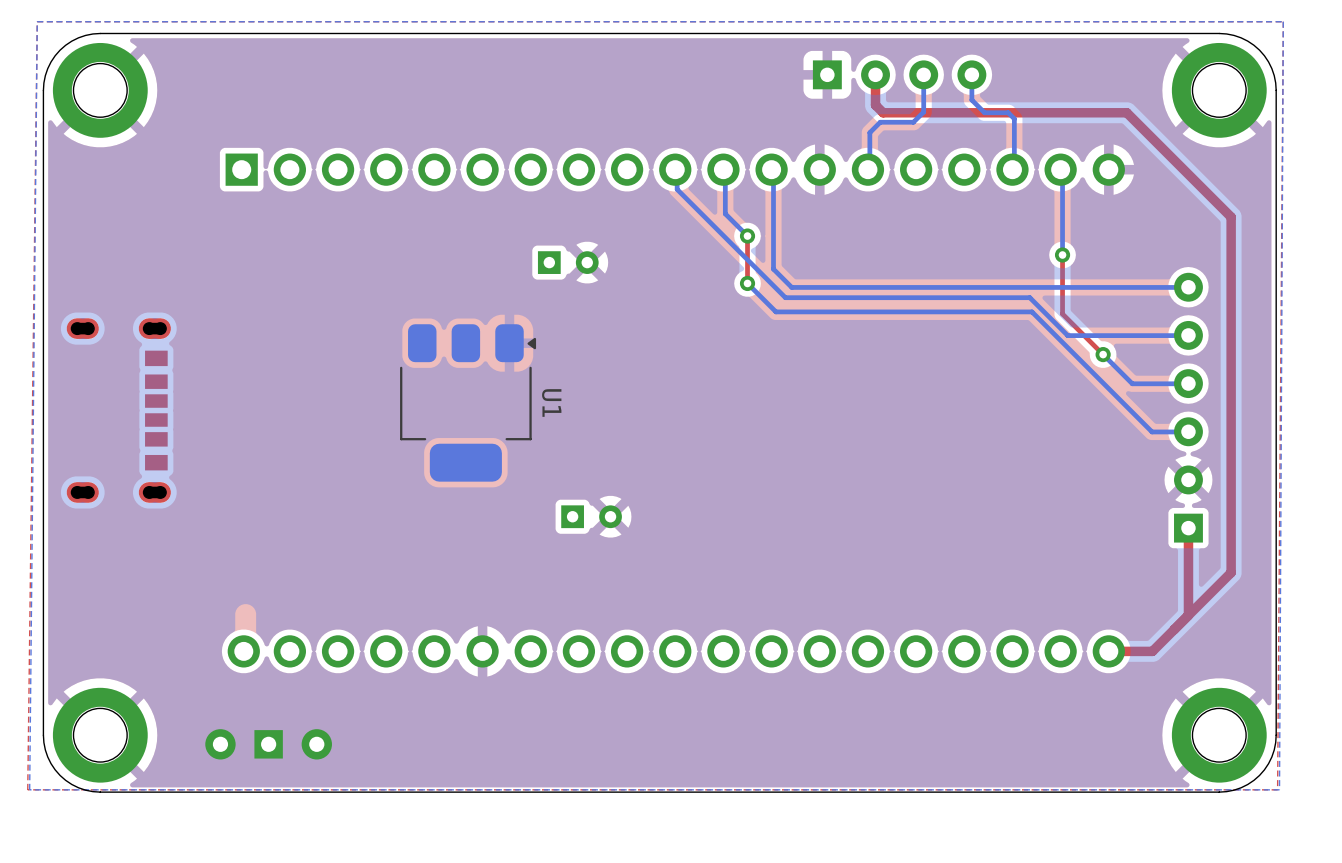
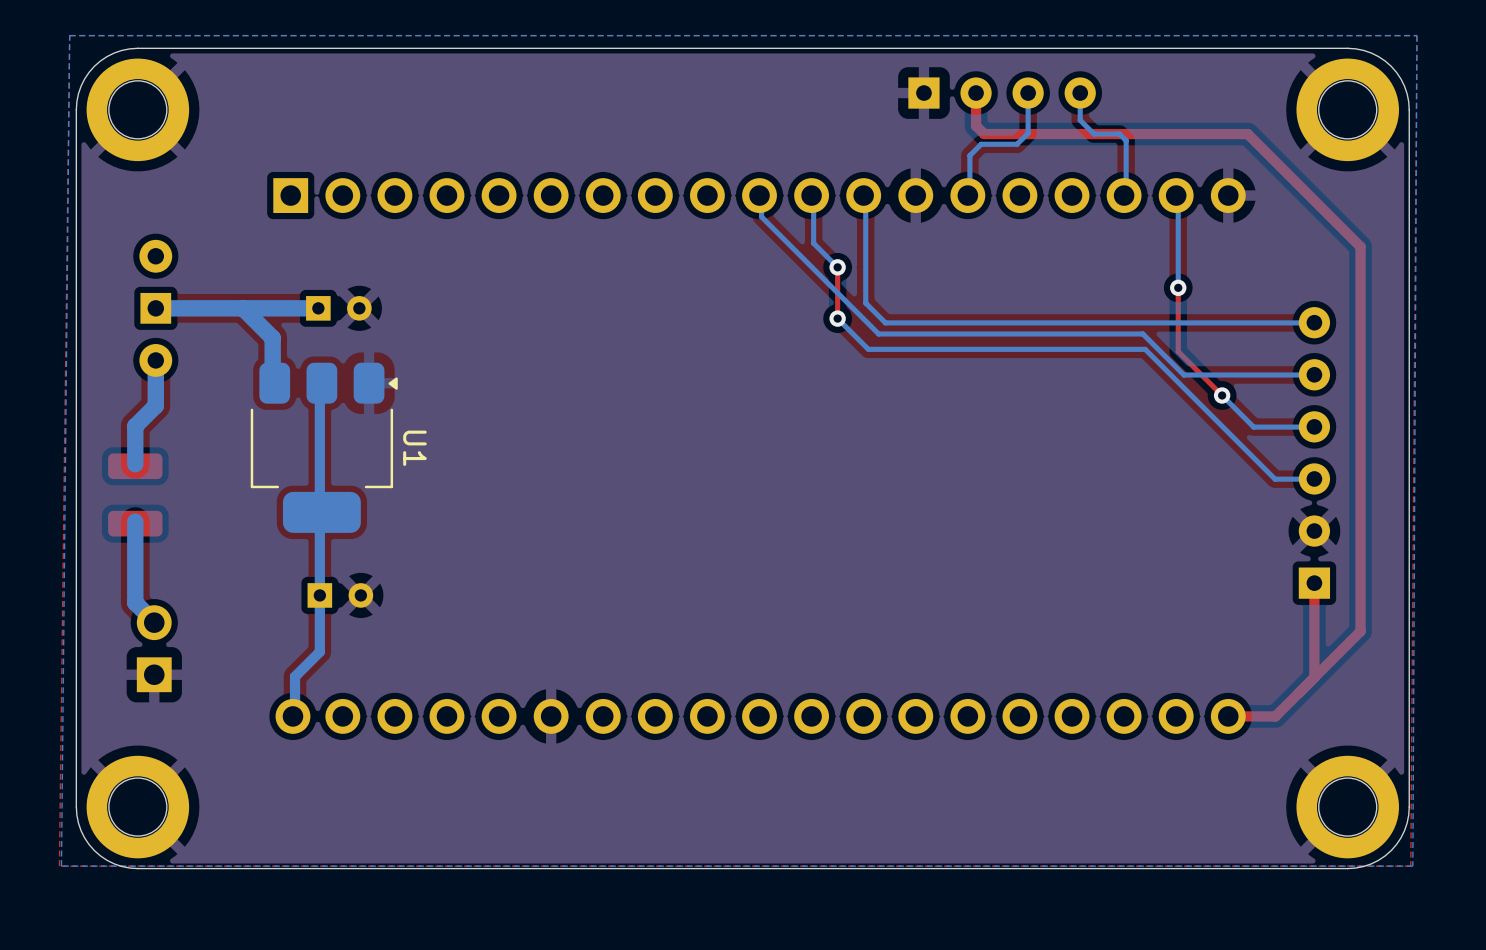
part: (568, 262) -> none
part: none -> (155, 308)
bottom track: none -> (242, 308) (272, 338) (272, 387)
bottom track: none -> (314, 308) (155, 308)
part: none -> (338, 308)
bottom track: none -> (155, 360) (155, 405) (135, 426) (135, 464)
bottom track: none -> (319, 387) (319, 651) (295, 676) (295, 716)
U1 position: (468, 402) -> (324, 447)
part: (118, 410) -> none
part: none -> (135, 494)
bottom track: none -> (135, 521) (135, 602) (154, 622)
part: (591, 516) -> none
part: none -> (340, 595)
part: none -> (154, 648)
part: (268, 744) -> none

